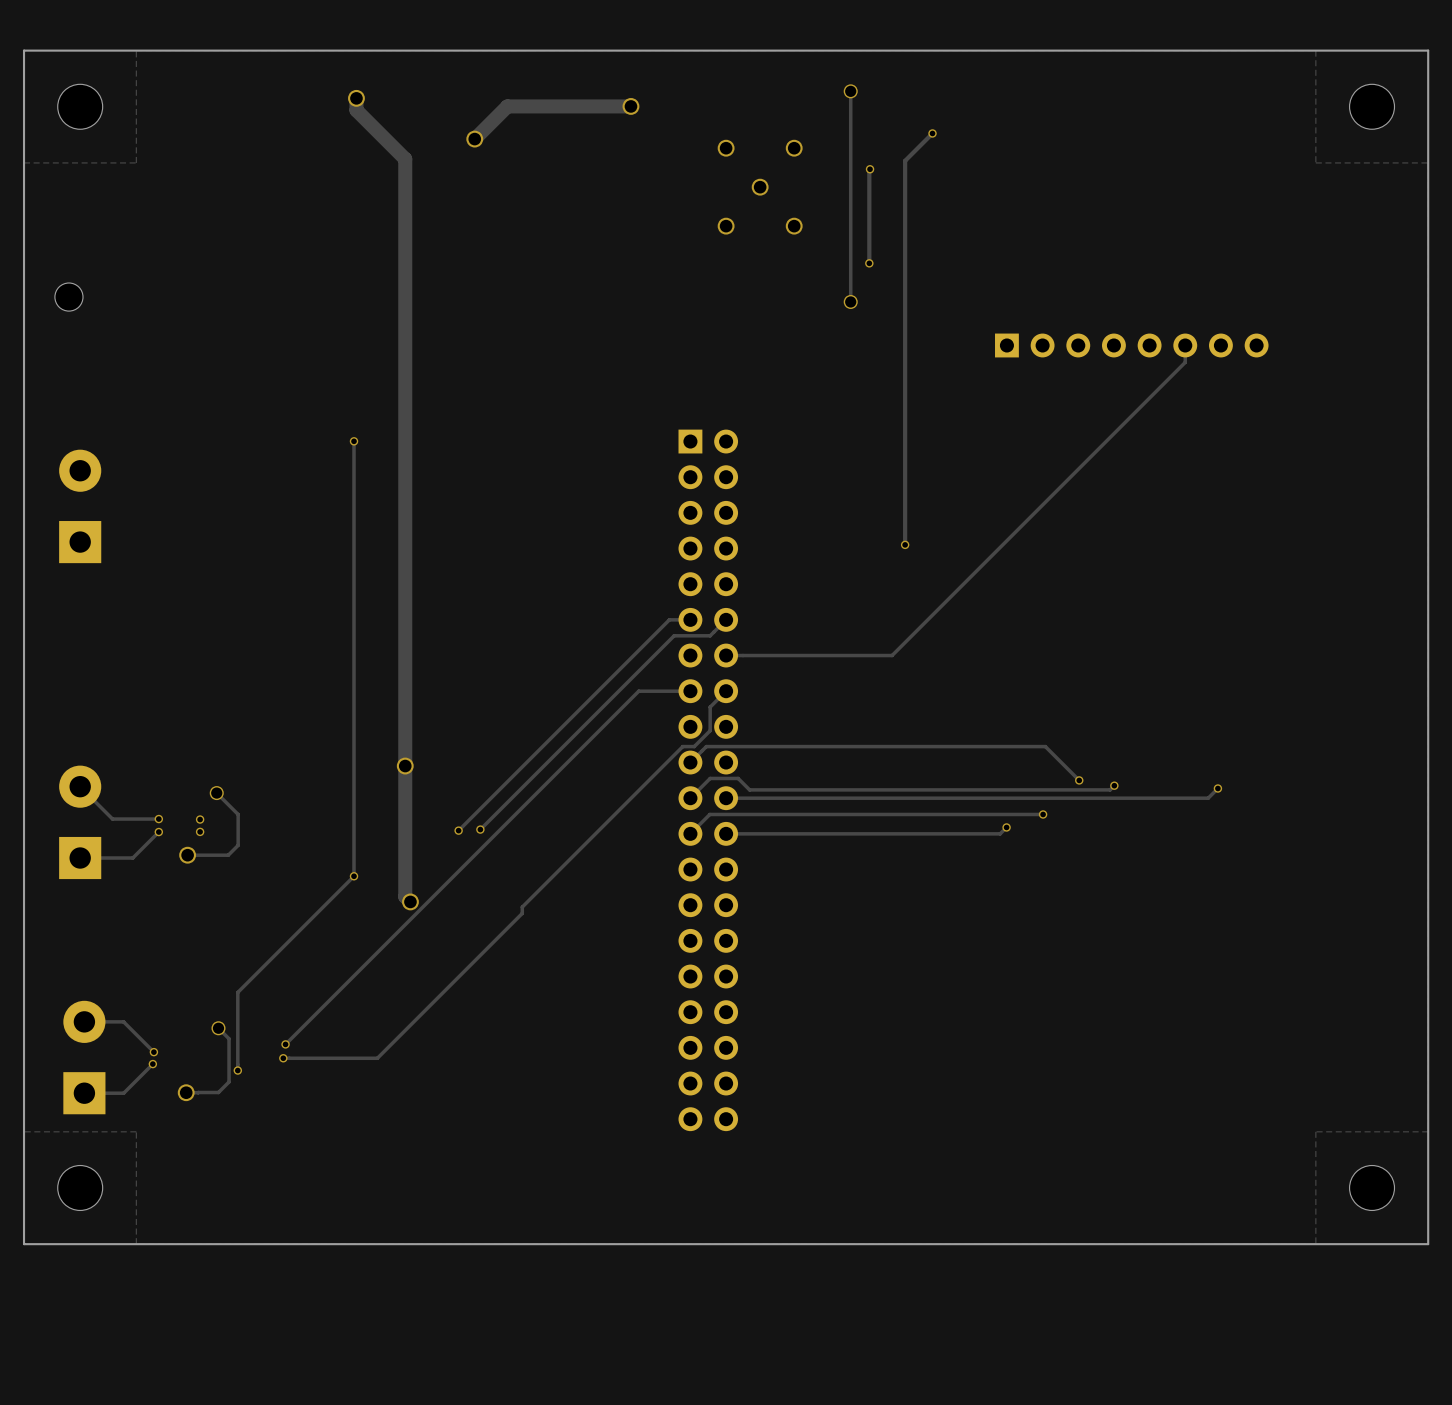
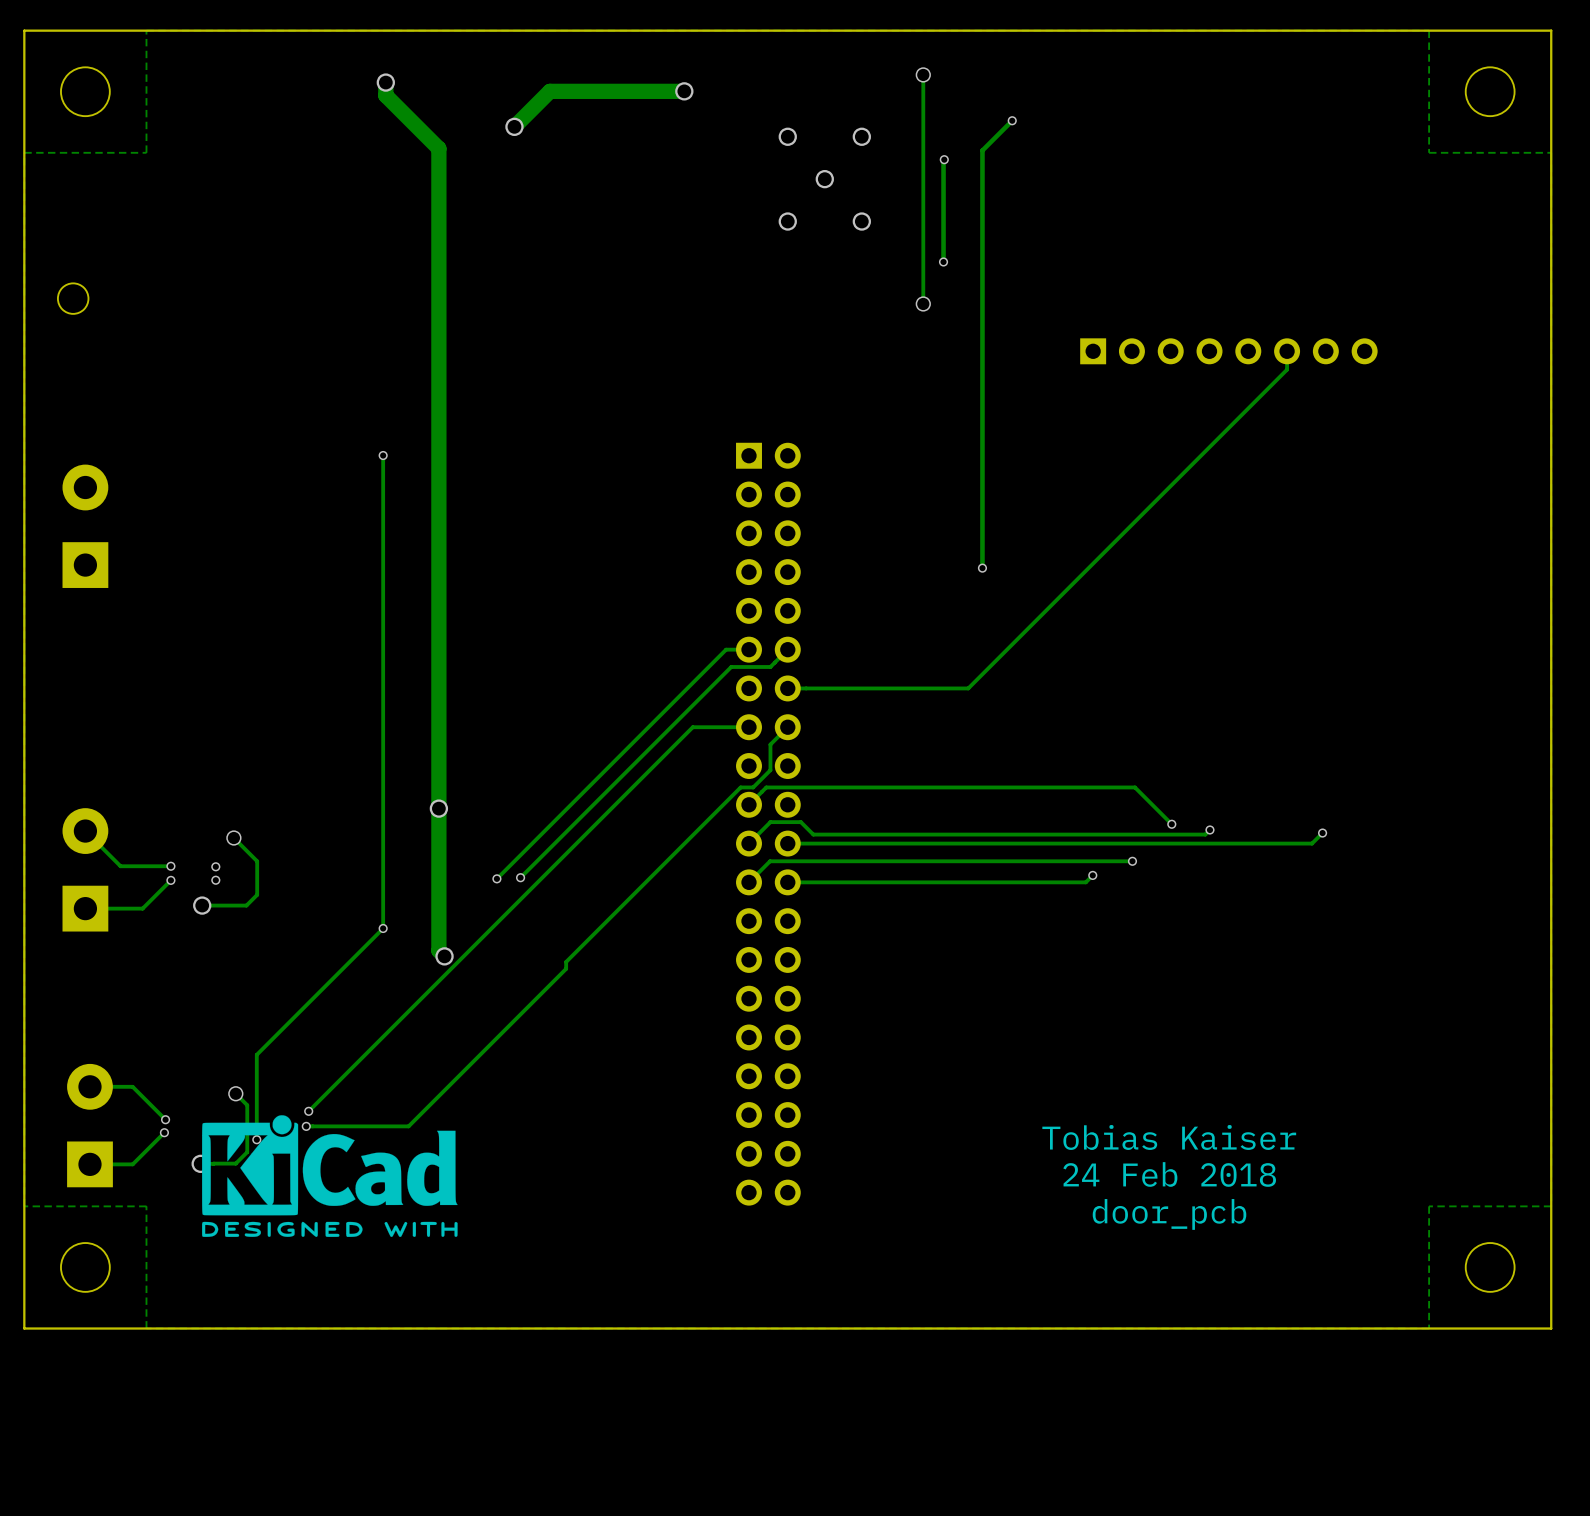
drawing: none -> [202, 1115, 458, 1237]
text: none -> Tobias Kaiser (1169, 1137)
text: none -> 24 Feb 2018 (1169, 1174)
text: none -> door_pcb (1169, 1214)

